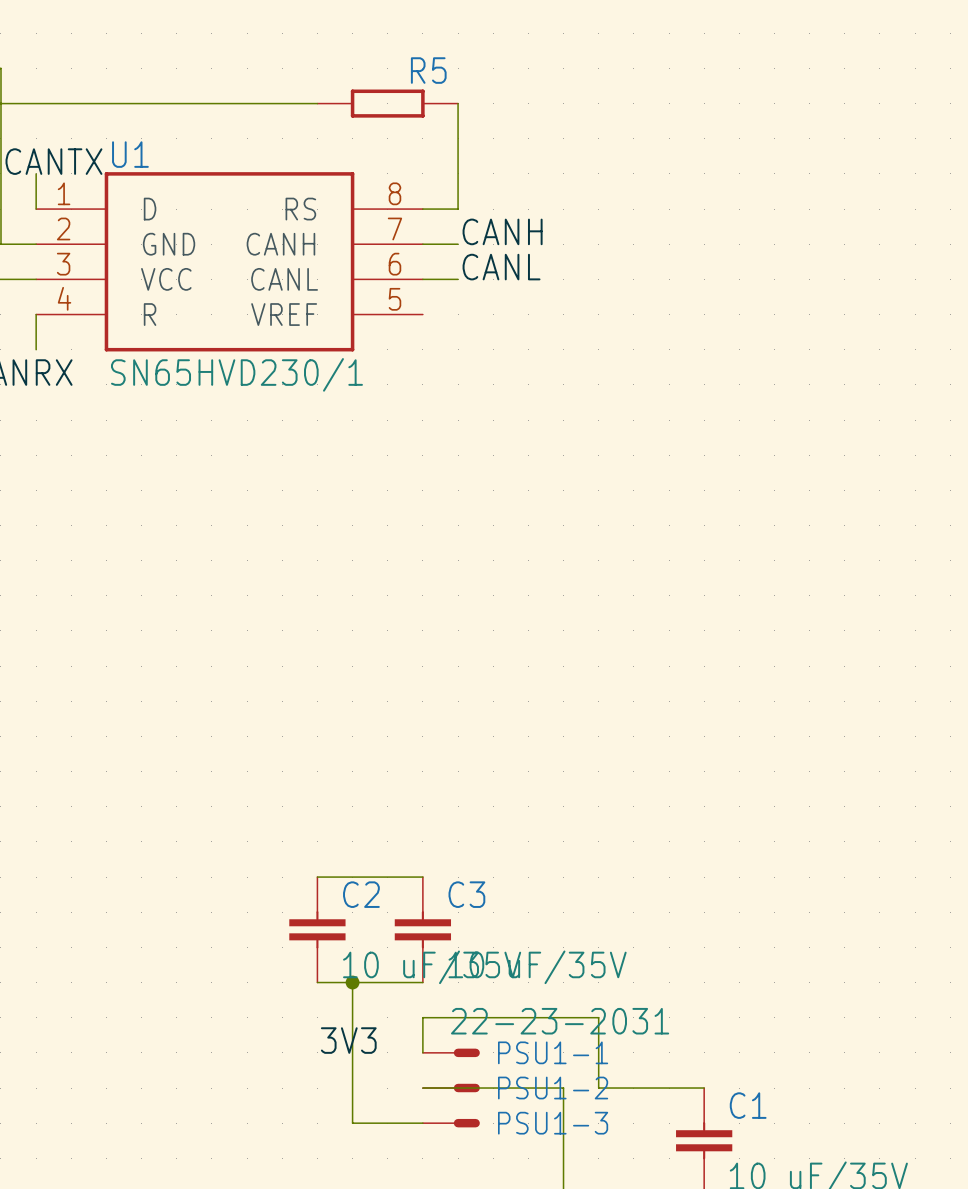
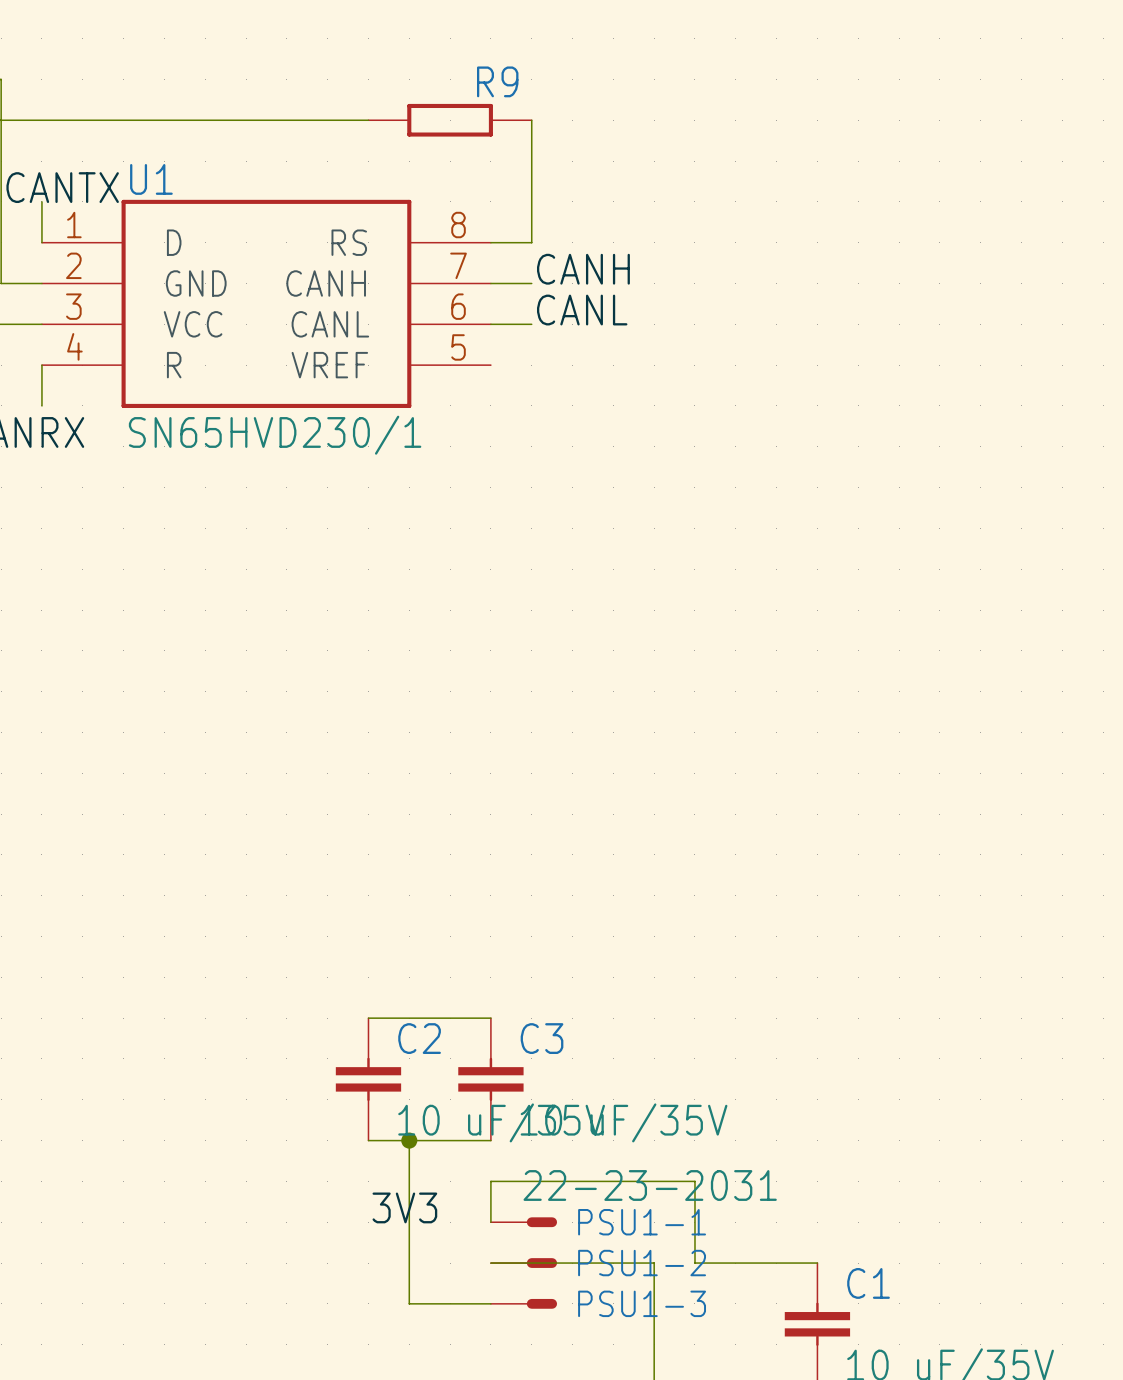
R5 name: R5 (428, 70) -> R9 (497, 81)

